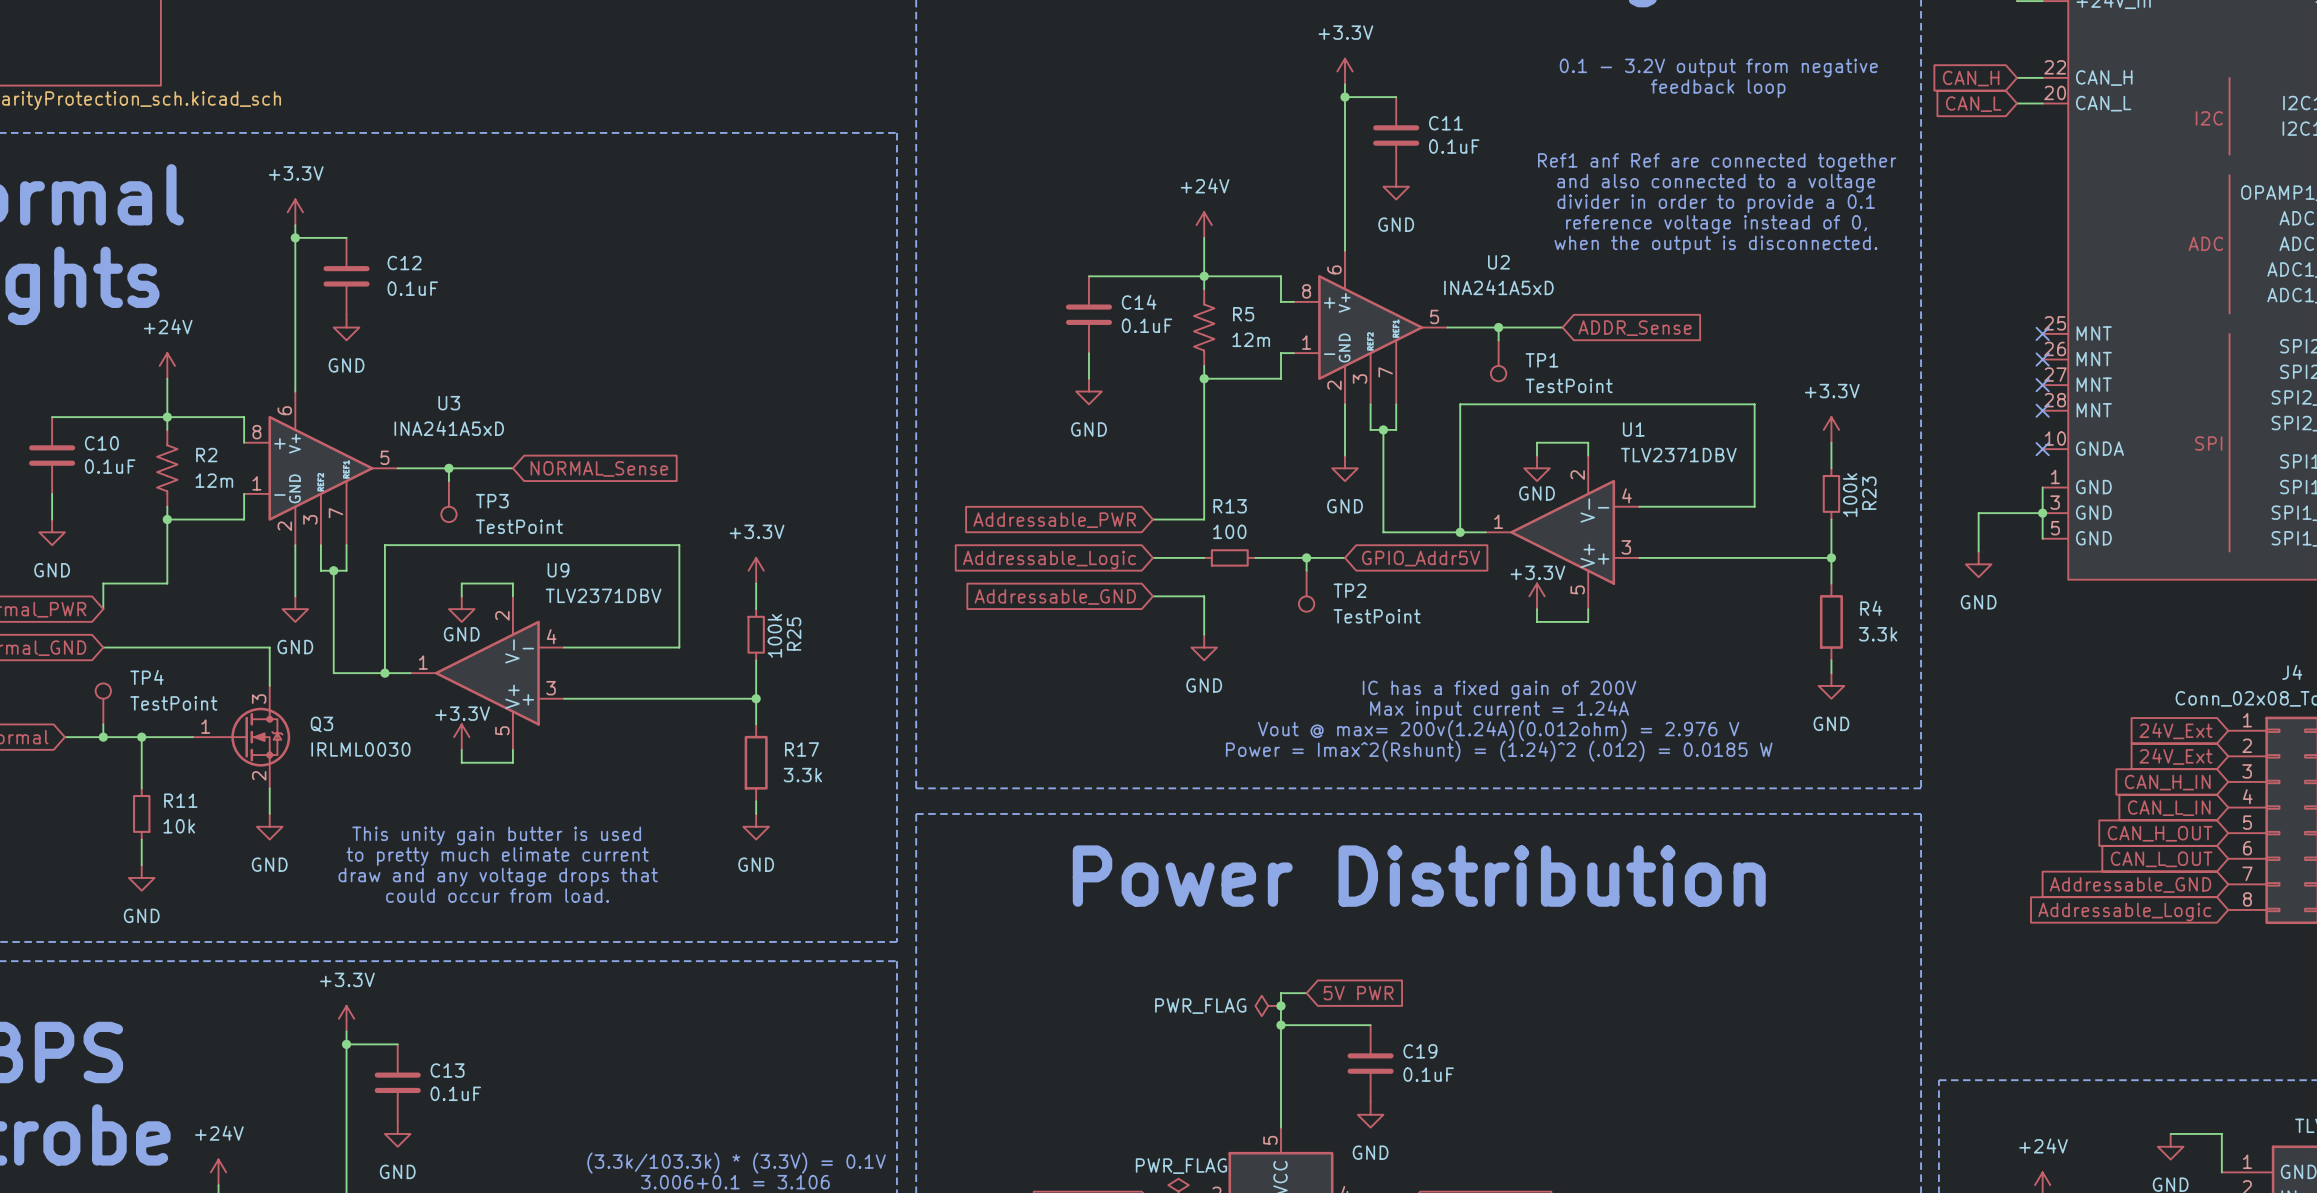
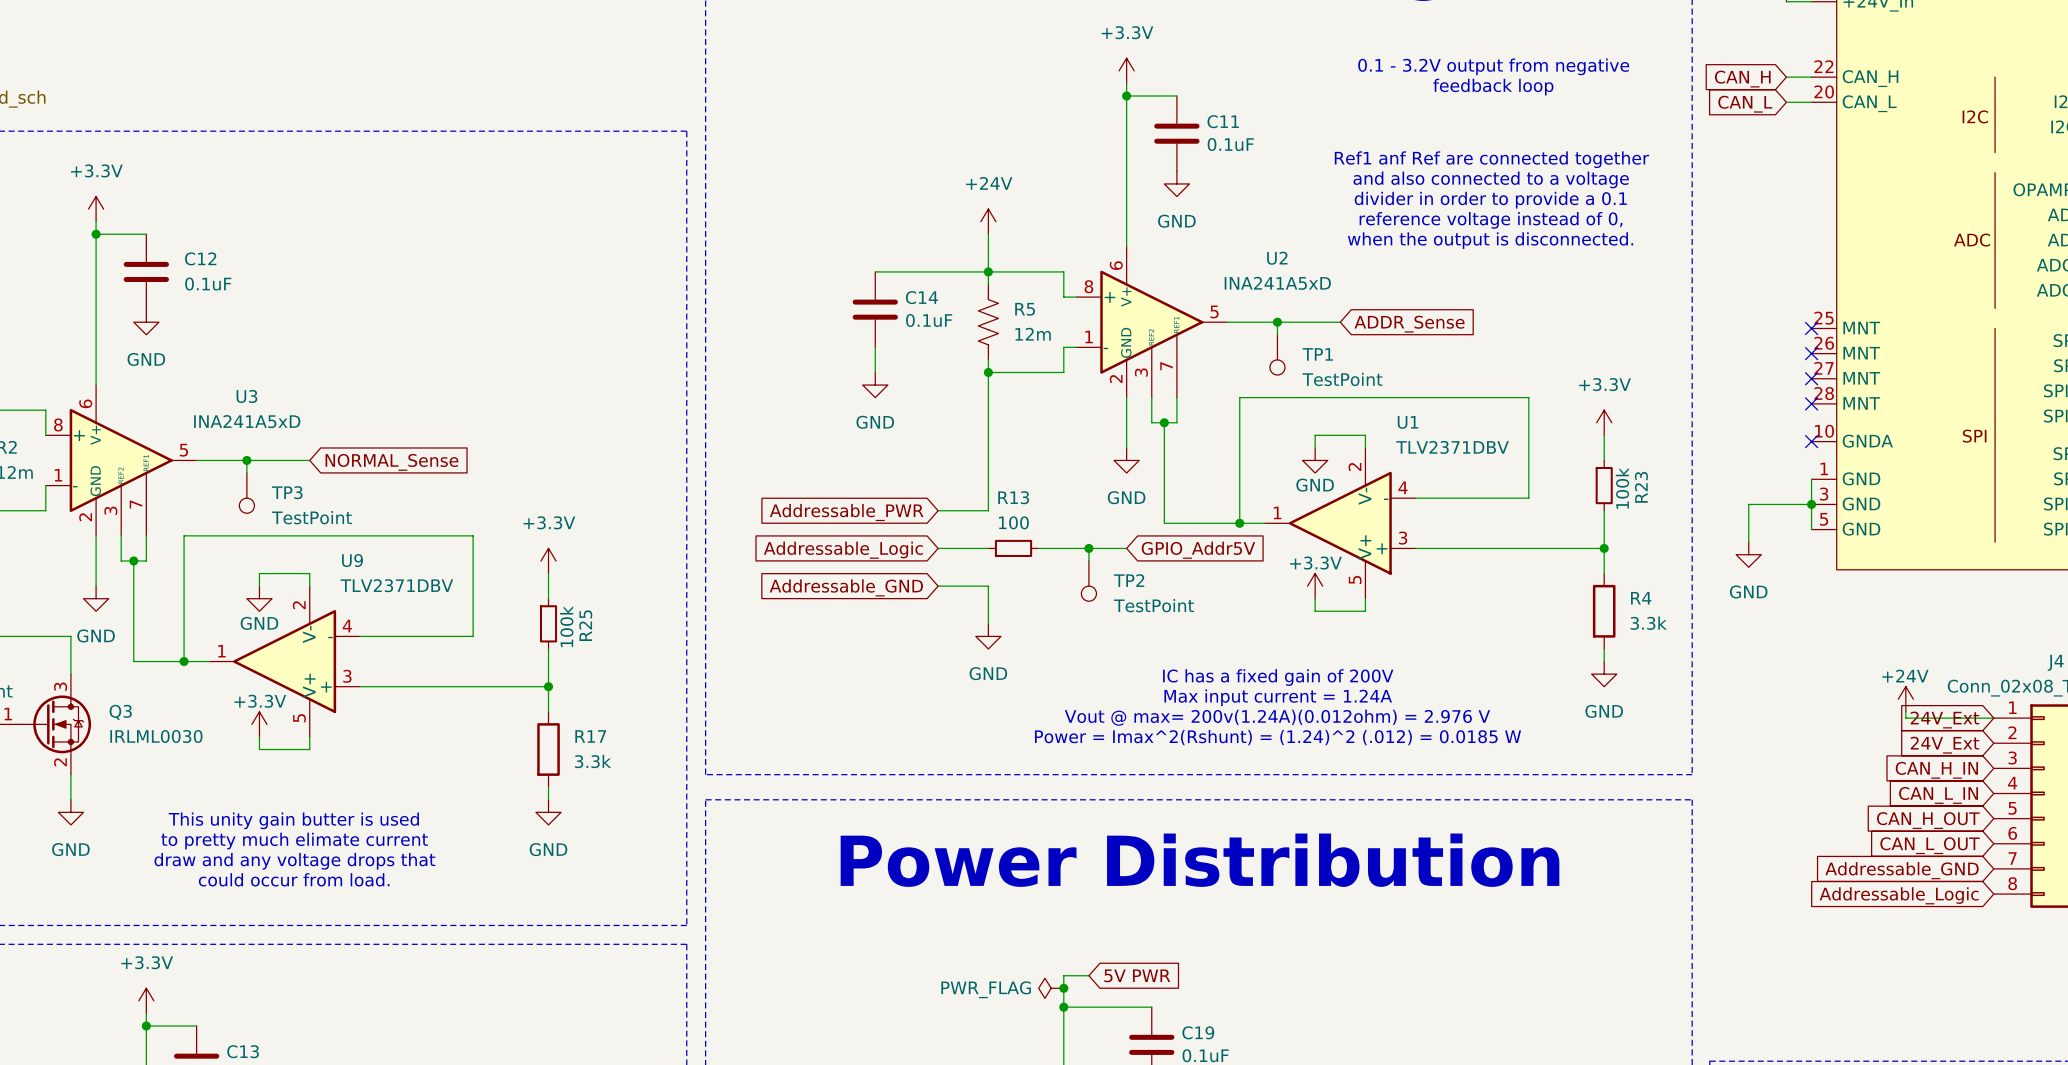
power symbol: none -> +24V (1905, 699)
wire: none -> (1905, 711) (1905, 718) (1993, 718)

